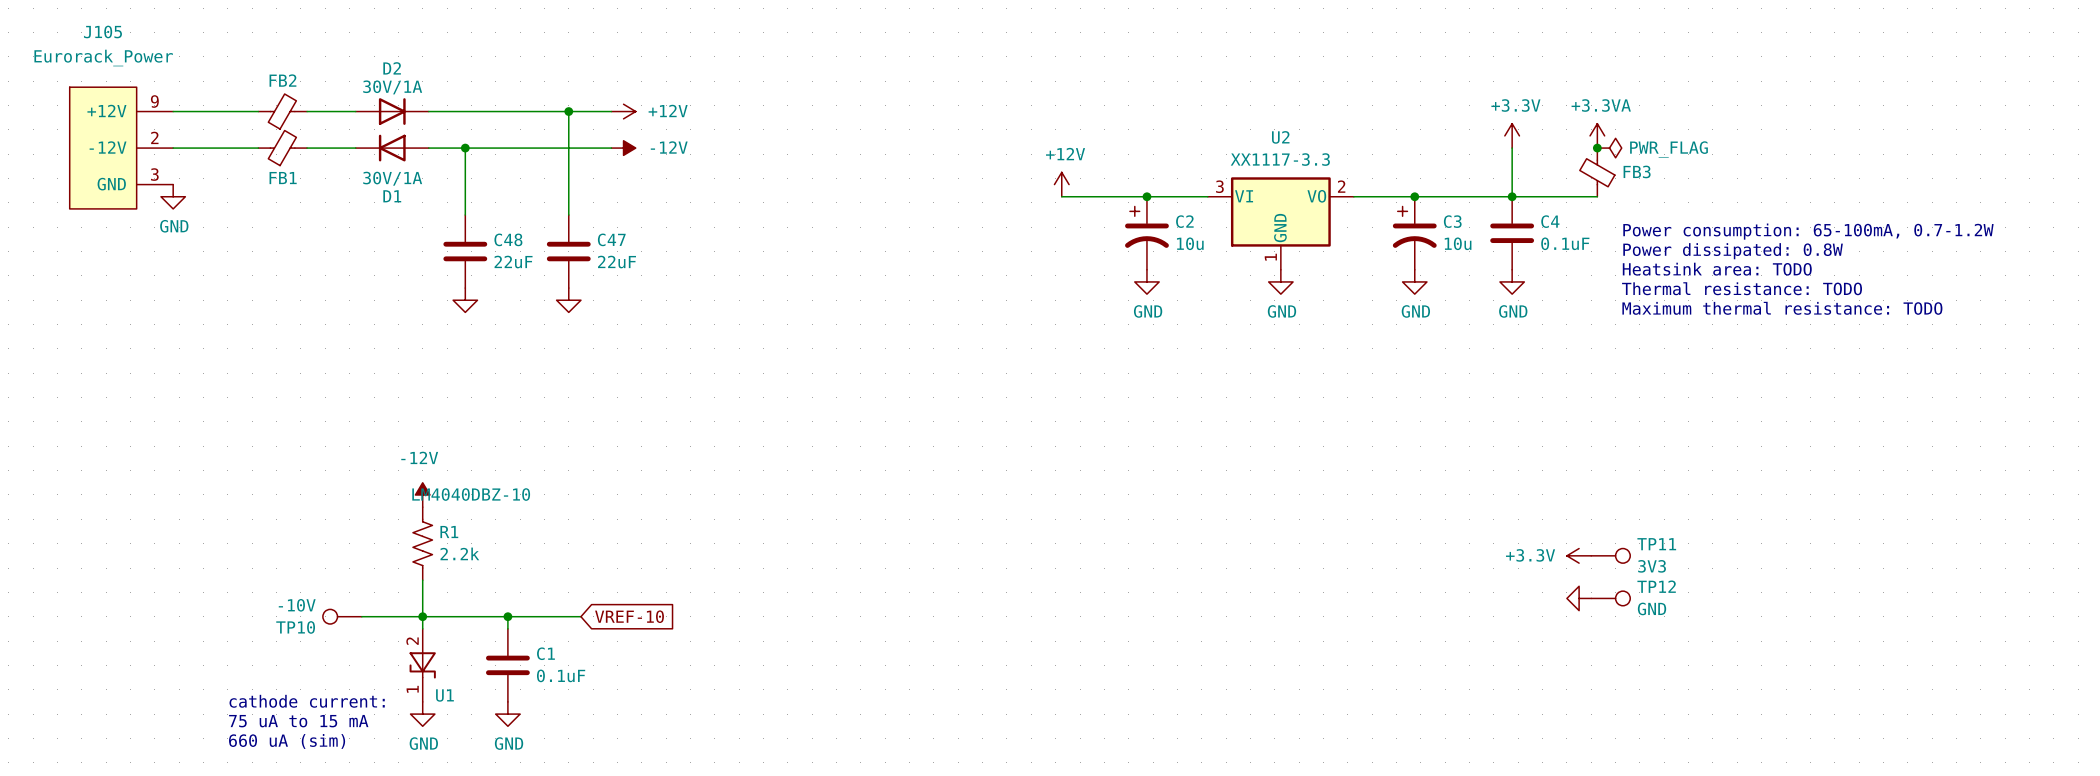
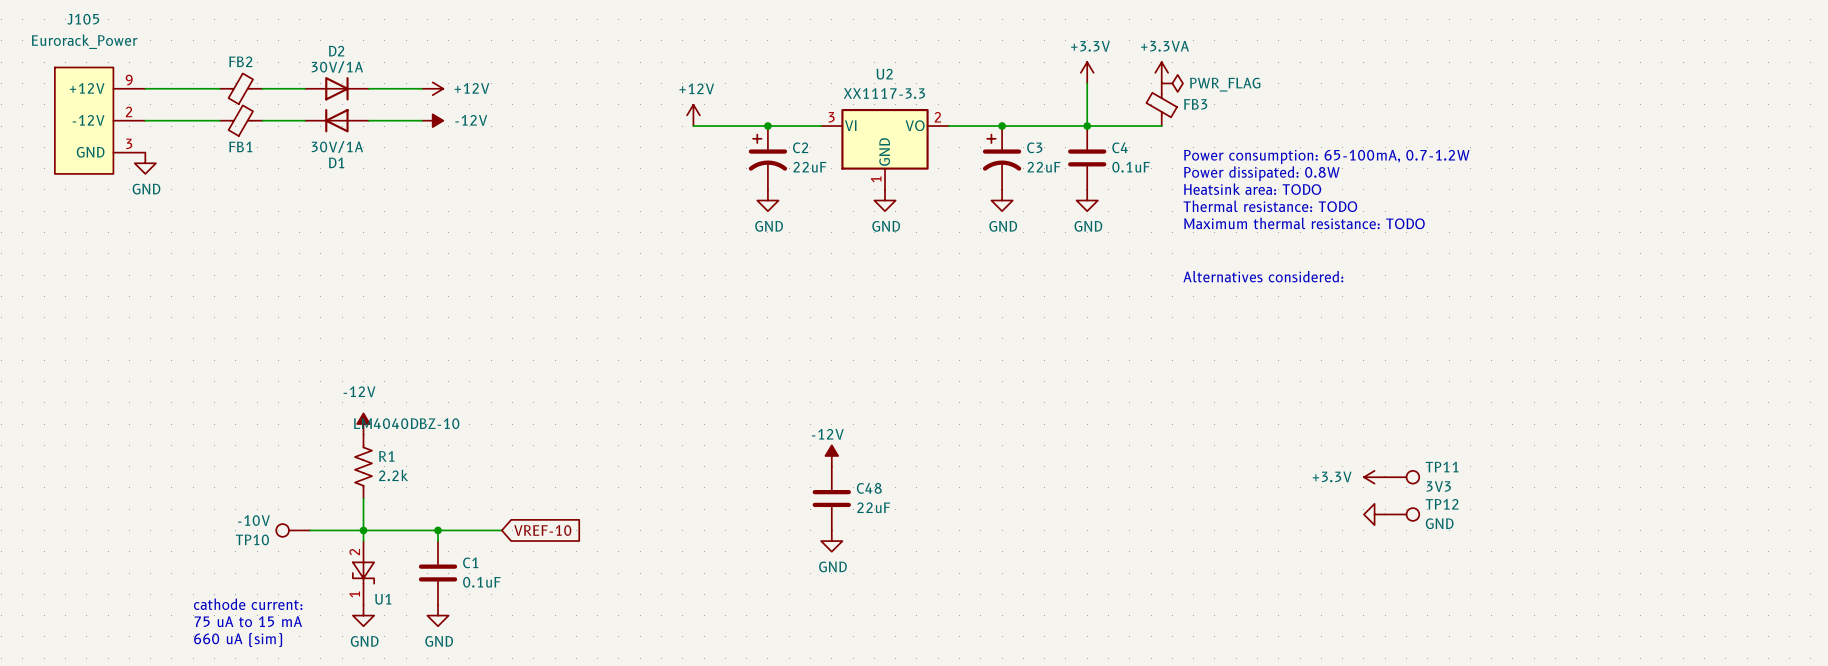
power symbol: none -> +3.3V (1087, 72)
power symbol: none -> +3.3VA (1161, 72)
wire: none -> (1087, 83) (1087, 126)
power symbol: none -> PWR_FLAG (1172, 83)
wire: (489, 111) (611, 111) -> none
power symbol: none -> +12V (432, 88)
wire: (568, 111) (568, 215) -> none
junction: (568, 111) -> none
power symbol: +12V (623, 111) -> none
power symbol: +3.3V (1512, 135) -> none
power symbol: +3.3VA (1597, 135) -> none
power symbol: none -> +12V (693, 115)
wire: (465, 148) (465, 215) -> none
junction: (465, 148) -> none
wire: (489, 148) (611, 148) -> none
power symbol position: -12V (623, 148) -> -12V (432, 120)
wire: (1512, 148) (1512, 196) -> none
junction: (1597, 148) -> none
power symbol: PWR_FLAG (1609, 148) -> none
wire: none -> (693, 126) (821, 126)
junction: none -> (767, 126)
wire: none -> (948, 126) (1161, 126)
junction: none -> (1087, 126)
FB3 position: (1597, 172) -> (1161, 104)
power symbol: +12V (1061, 184) -> none
text: none -> Power consumption: 65-100mA, 0.7-1.2W (1326, 156)
wire: (1061, 196) (1207, 196) -> none
junction position: (1146, 196) -> (1002, 126)
wire: (1353, 196) (1597, 196) -> none
junction: (1414, 196) -> none
junction: (1512, 196) -> none
text: none -> Power dissipated: 0.8W (1261, 173)
U2 position: (1280, 223) -> (885, 149)
text: none -> Heatsink area: TODO (1252, 189)
text: Power consumption: 65-100mA, 0.7-1.2W (1808, 231) -> none
C2 position: (1146, 233) -> (767, 157)
C3 position: (1414, 233) -> (1002, 157)
C4 position: (1512, 233) -> (1087, 157)
power symbol: none -> GND (767, 200)
power symbol: none -> GND (885, 200)
C2 value: 10u (1190, 243) -> 22uF (809, 167)
C3 value: 10u (1458, 243) -> 22uF (1044, 167)
text: none -> Thermal resistance: TODO (1270, 206)
C48 position: (465, 251) -> (831, 498)
C47: 22uF (568, 251) -> none
text: Power dissipated: 0.8W (1733, 251) -> none
text: none -> Maximum thermal resistance: TODO (1304, 223)
text: Heatsink area: TODO (1717, 269) -> none
power symbol position: GND (1146, 281) -> GND (1002, 200)
power symbol position: GND (1280, 281) -> GND (1087, 200)
power symbol: GND (1414, 281) -> none
power symbol: GND (1512, 281) -> none
text: Thermal resistance: TODO (1742, 288) -> none
power symbol: (465, 300) -> none
power symbol: (568, 300) -> none
text: Maximum thermal resistance: TODO (1782, 308) -> none
text: none -> Alternatives considered: (1263, 276)
power symbol: none -> -12V (831, 455)
power symbol: none -> GND (831, 541)

